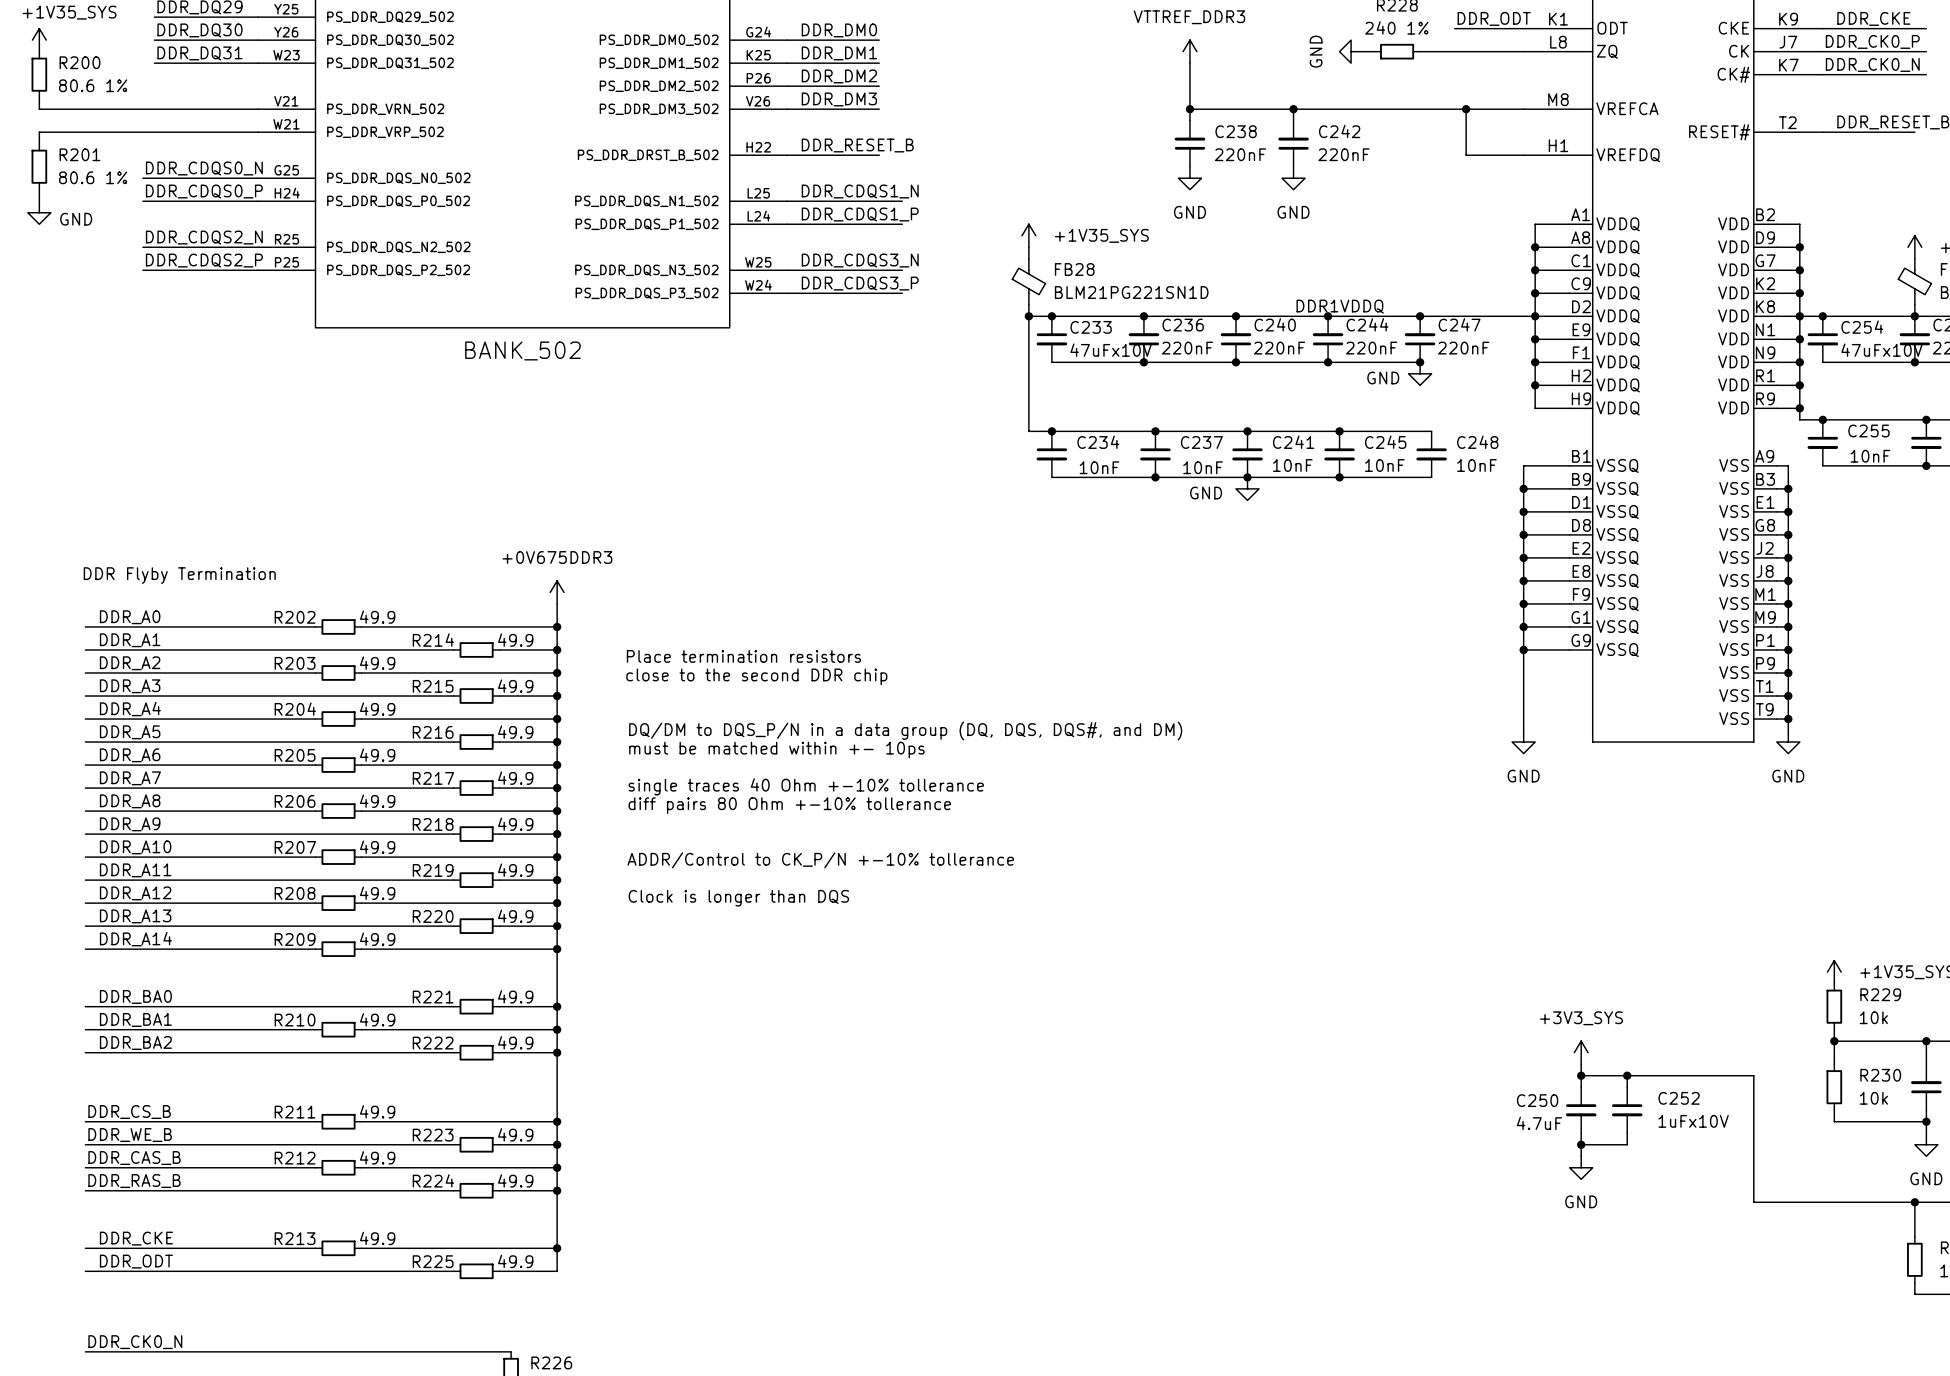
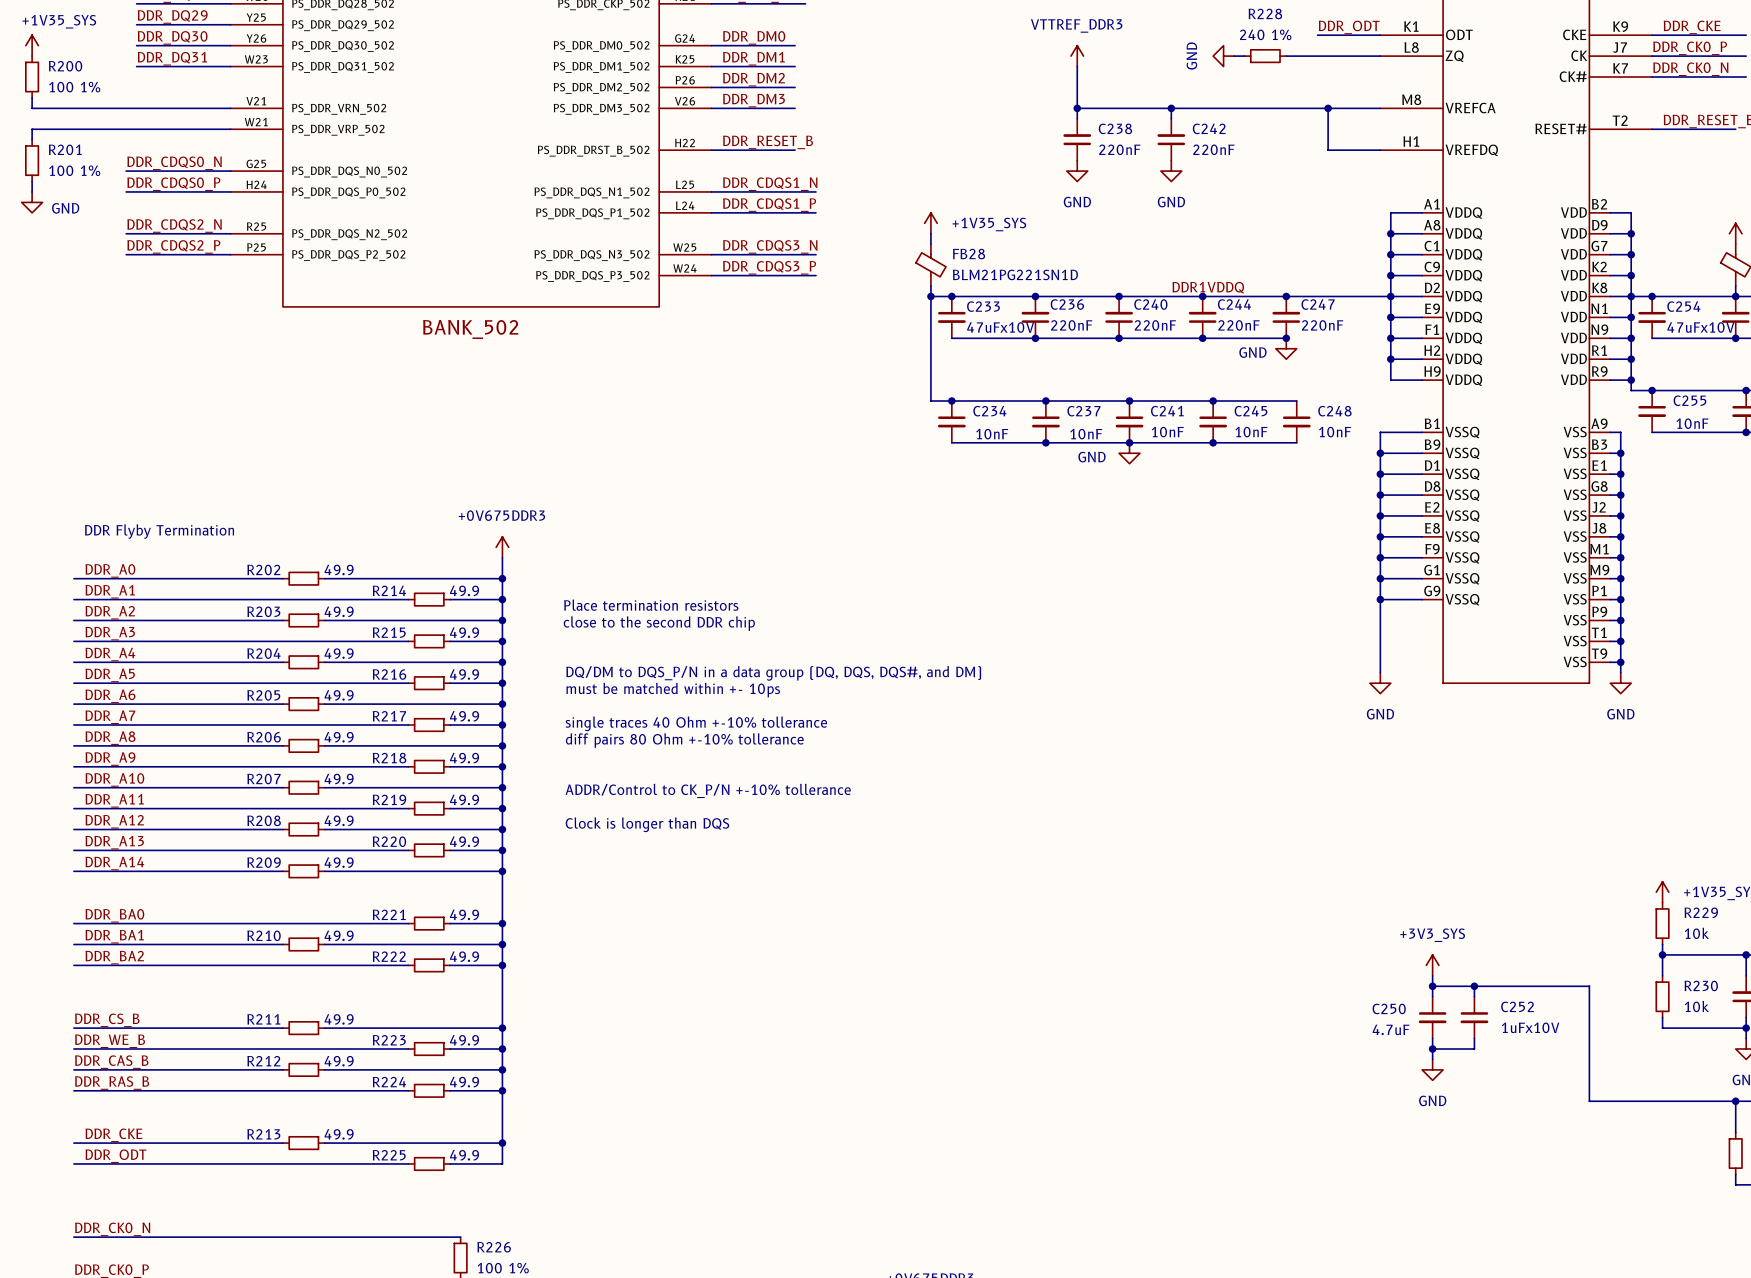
R200 value: 80.6 1% (93, 85) -> 100 1% (74, 87)
R201 value: 80.6 1% (93, 177) -> 100 1% (74, 170)

